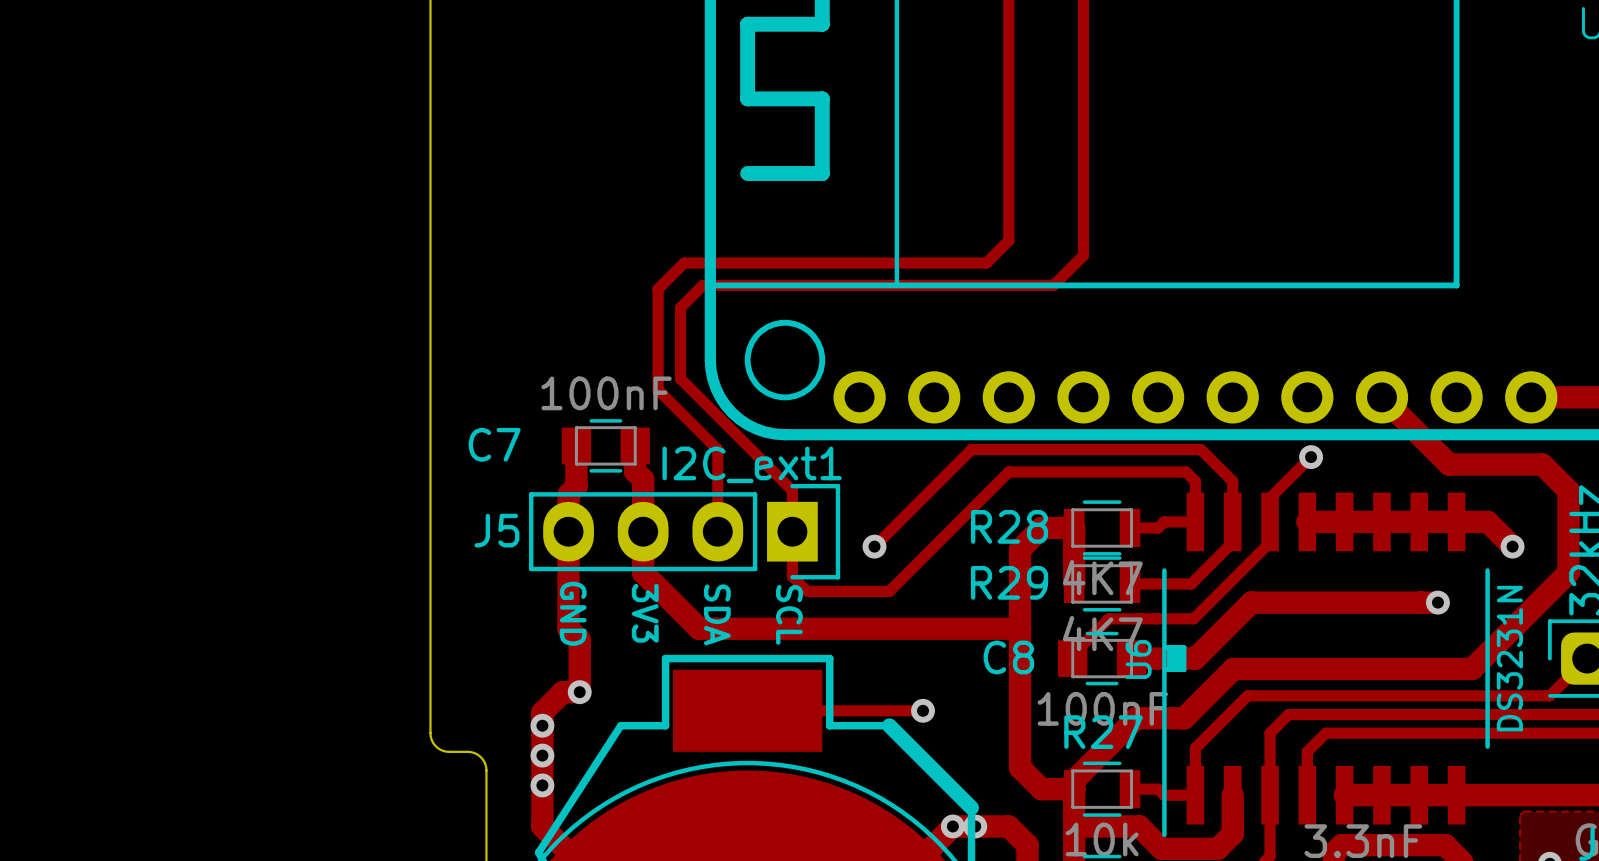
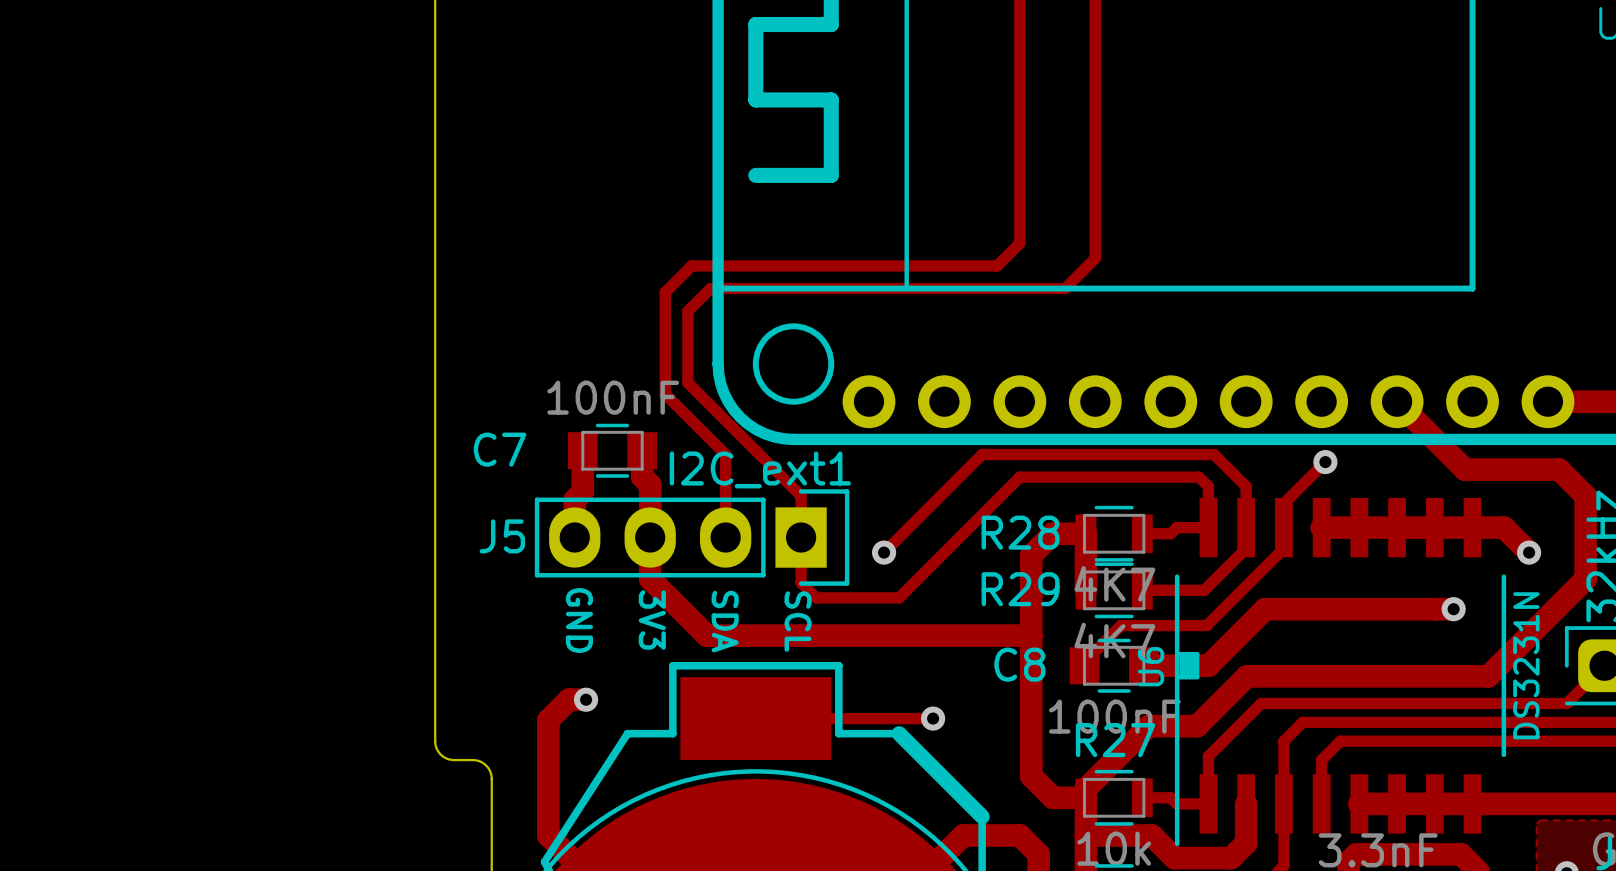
track: (568, 531) (568, 628) (579, 639) (579, 692) -> none
via: (542, 725) -> none
via: (542, 755) -> none
via: (542, 785) -> none
via: (952, 826) -> none
via: (975, 826) -> none

